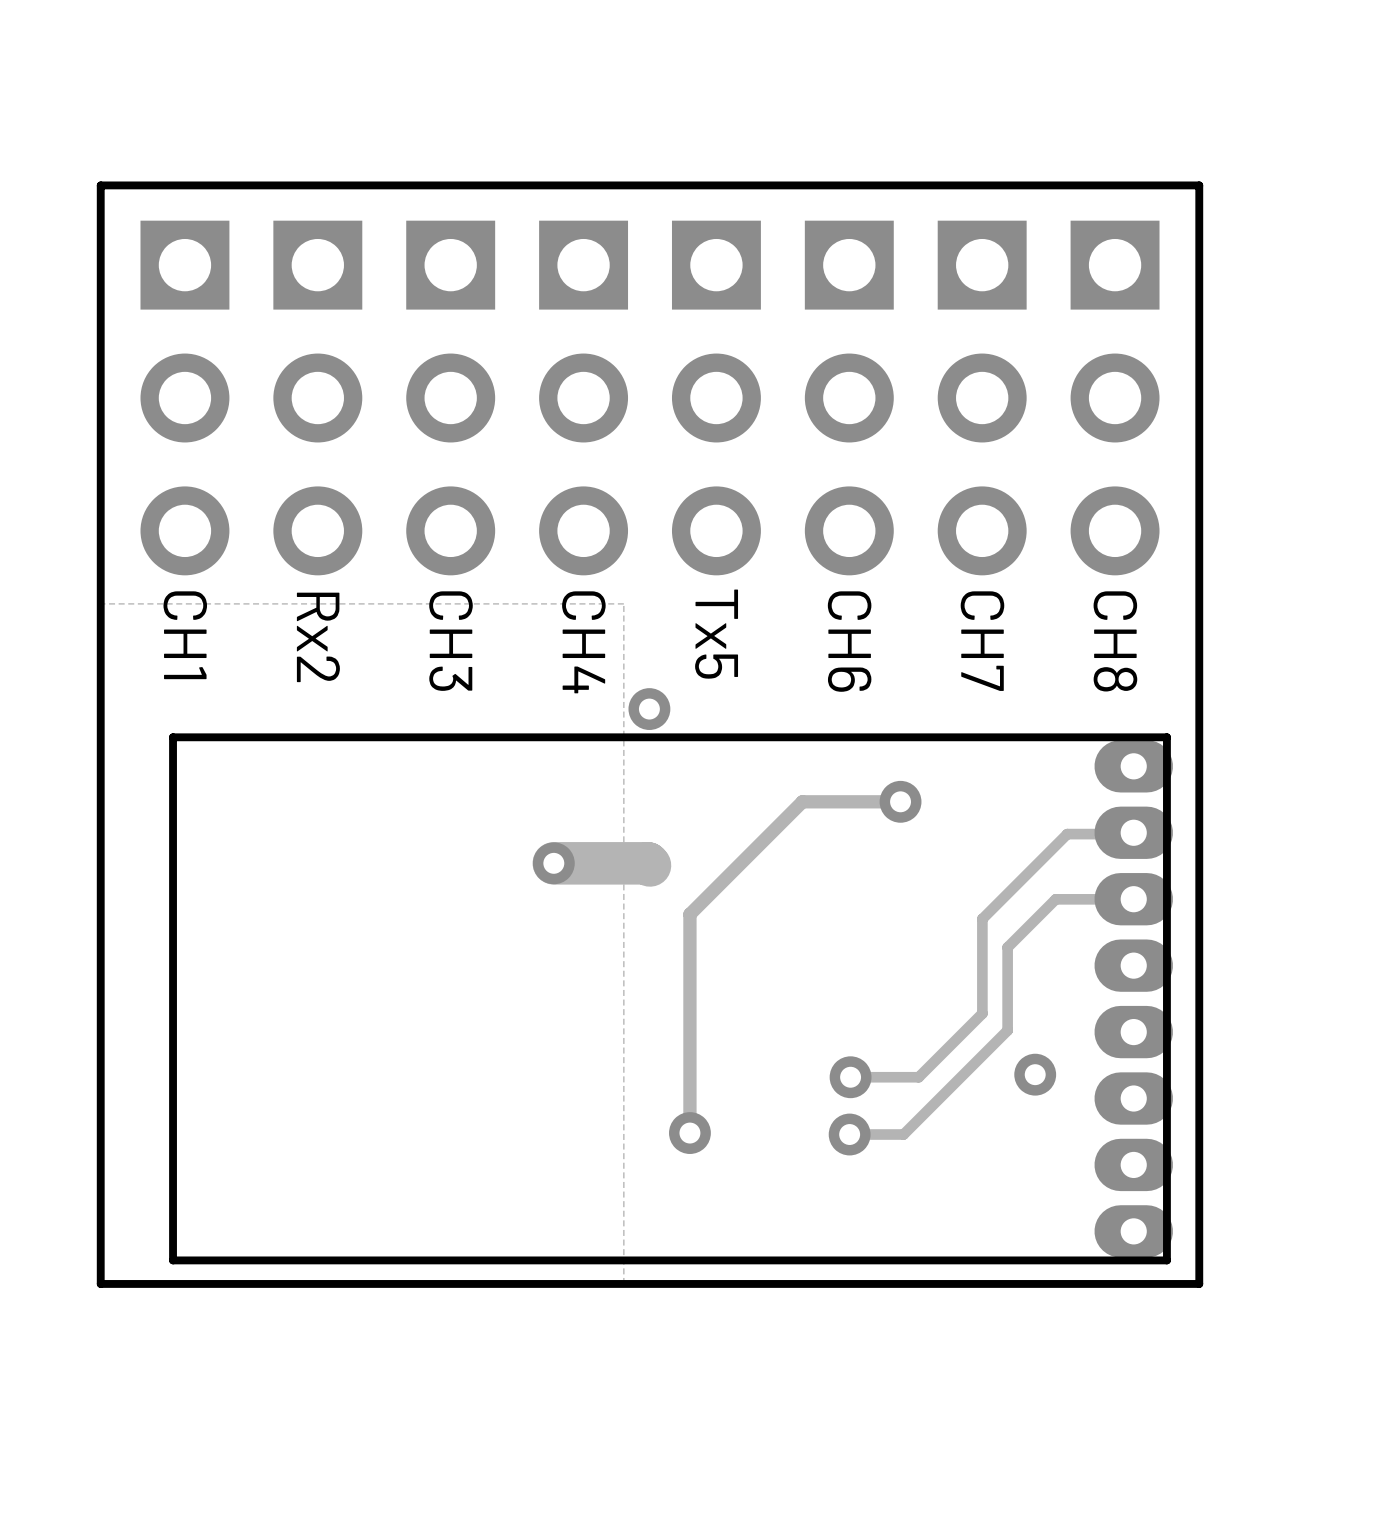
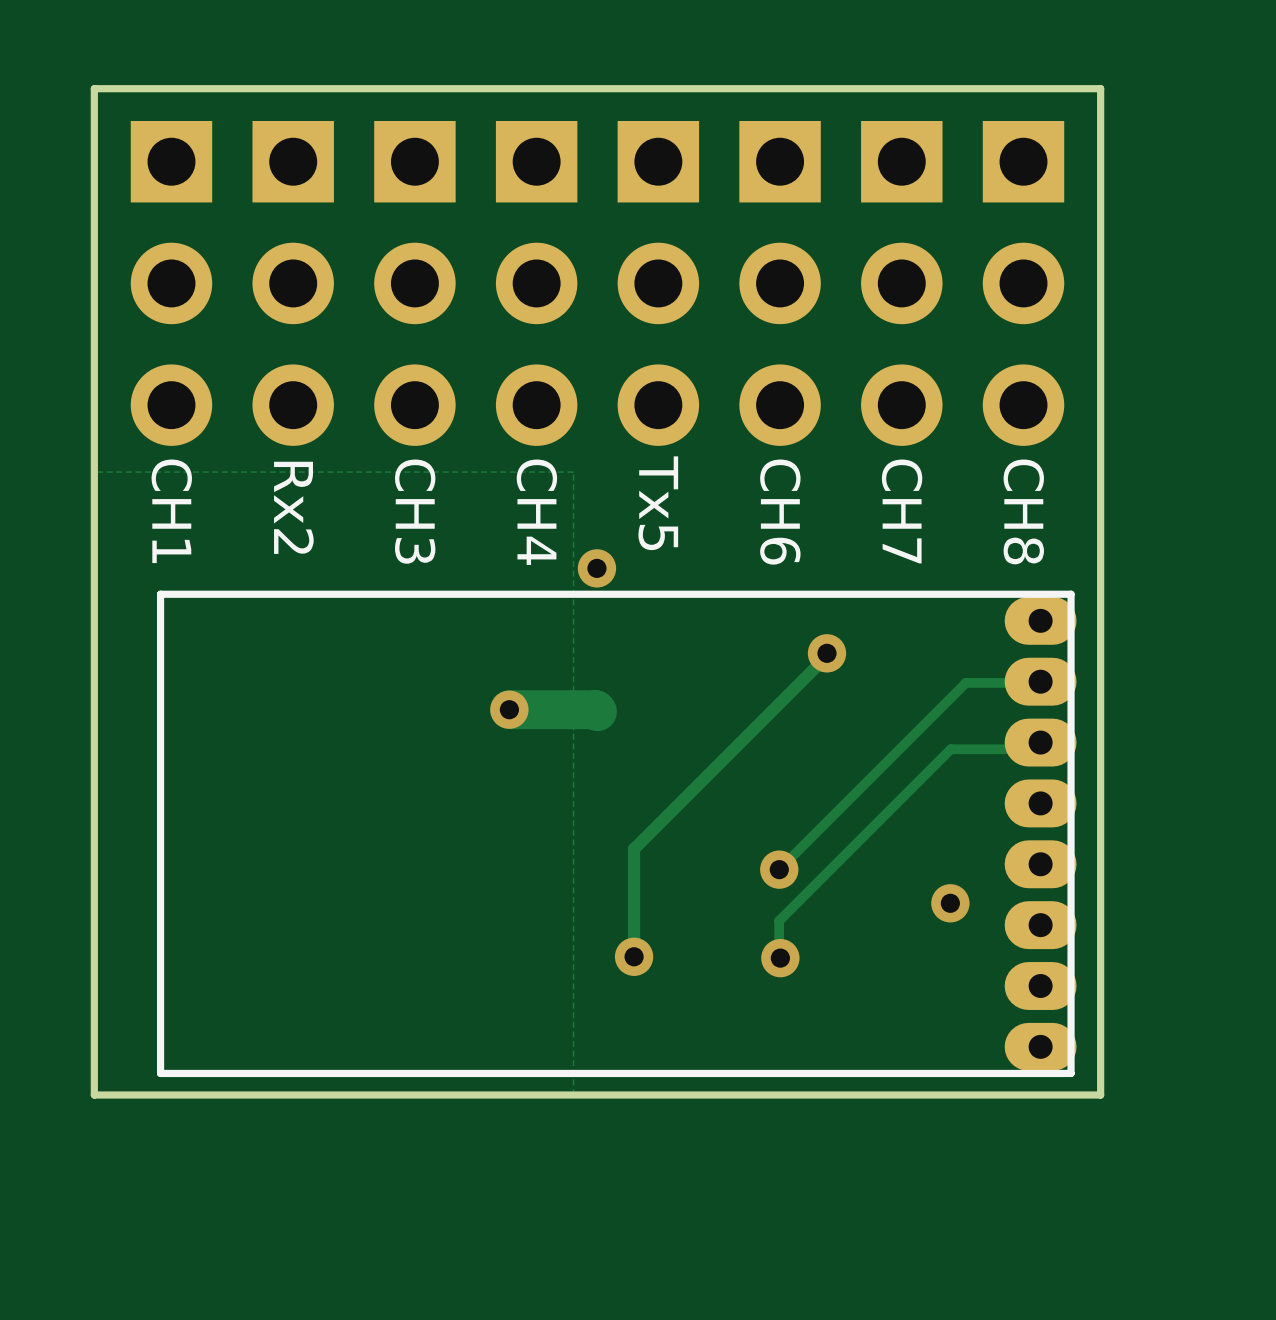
track: (900, 801) (802, 801) (689, 914) (689, 1015) -> (827, 653) (827, 656) (634, 849)
track: (1067, 834) (982, 919) (982, 1013) (918, 1077) (850, 1077) -> (979, 682) (966, 682) (779, 869)
track: (1132, 906) (1125, 899) (1055, 899) (1007, 947) (1007, 1030) (903, 1134) (849, 1134) -> (1039, 749) (950, 749) (779, 920) (779, 957)
via position: (850, 1077) -> (779, 869)

